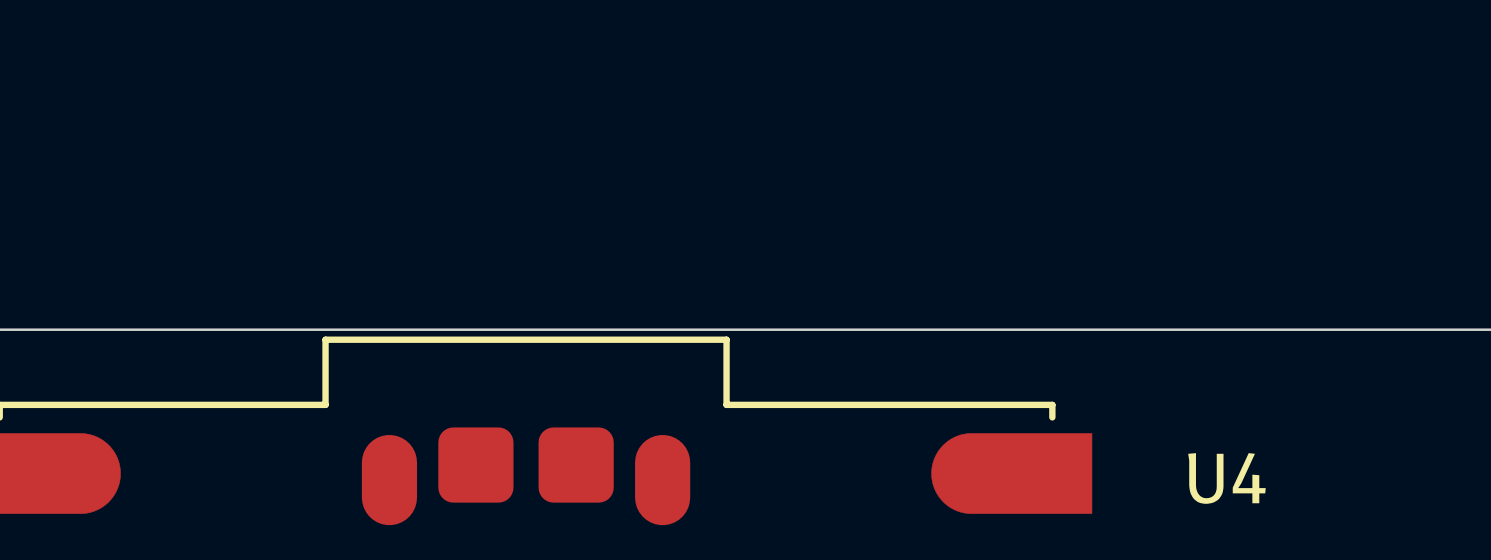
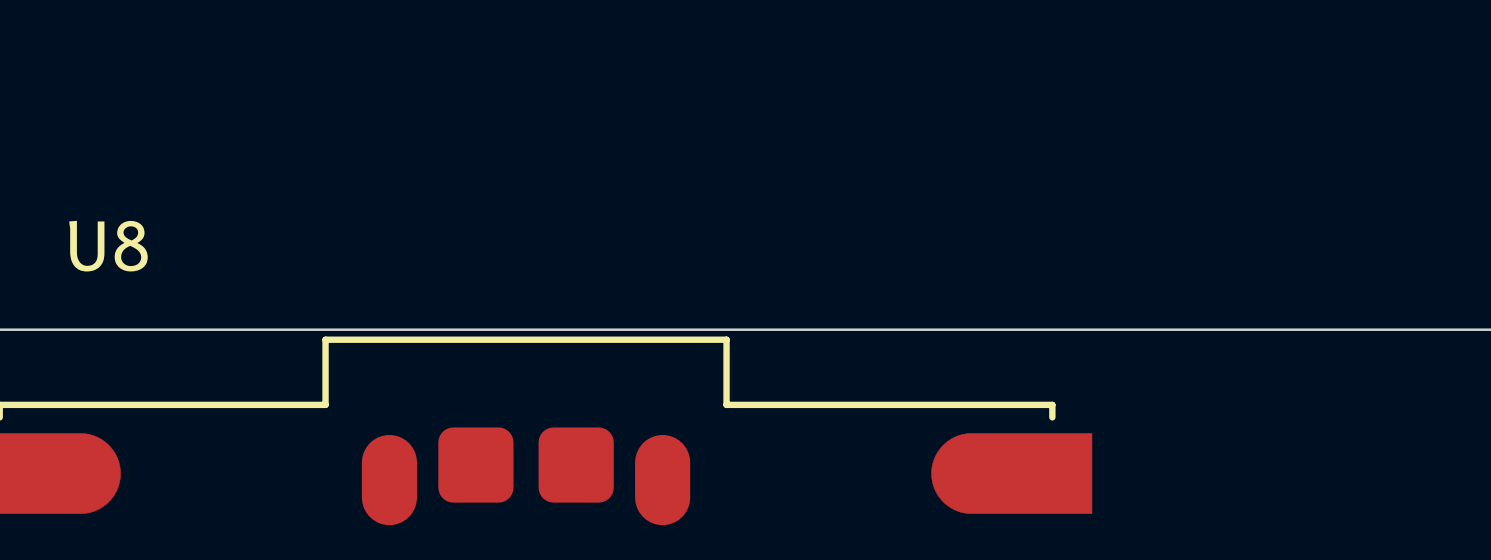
U4 name: U4 (1226, 478) -> U8 (108, 246)

